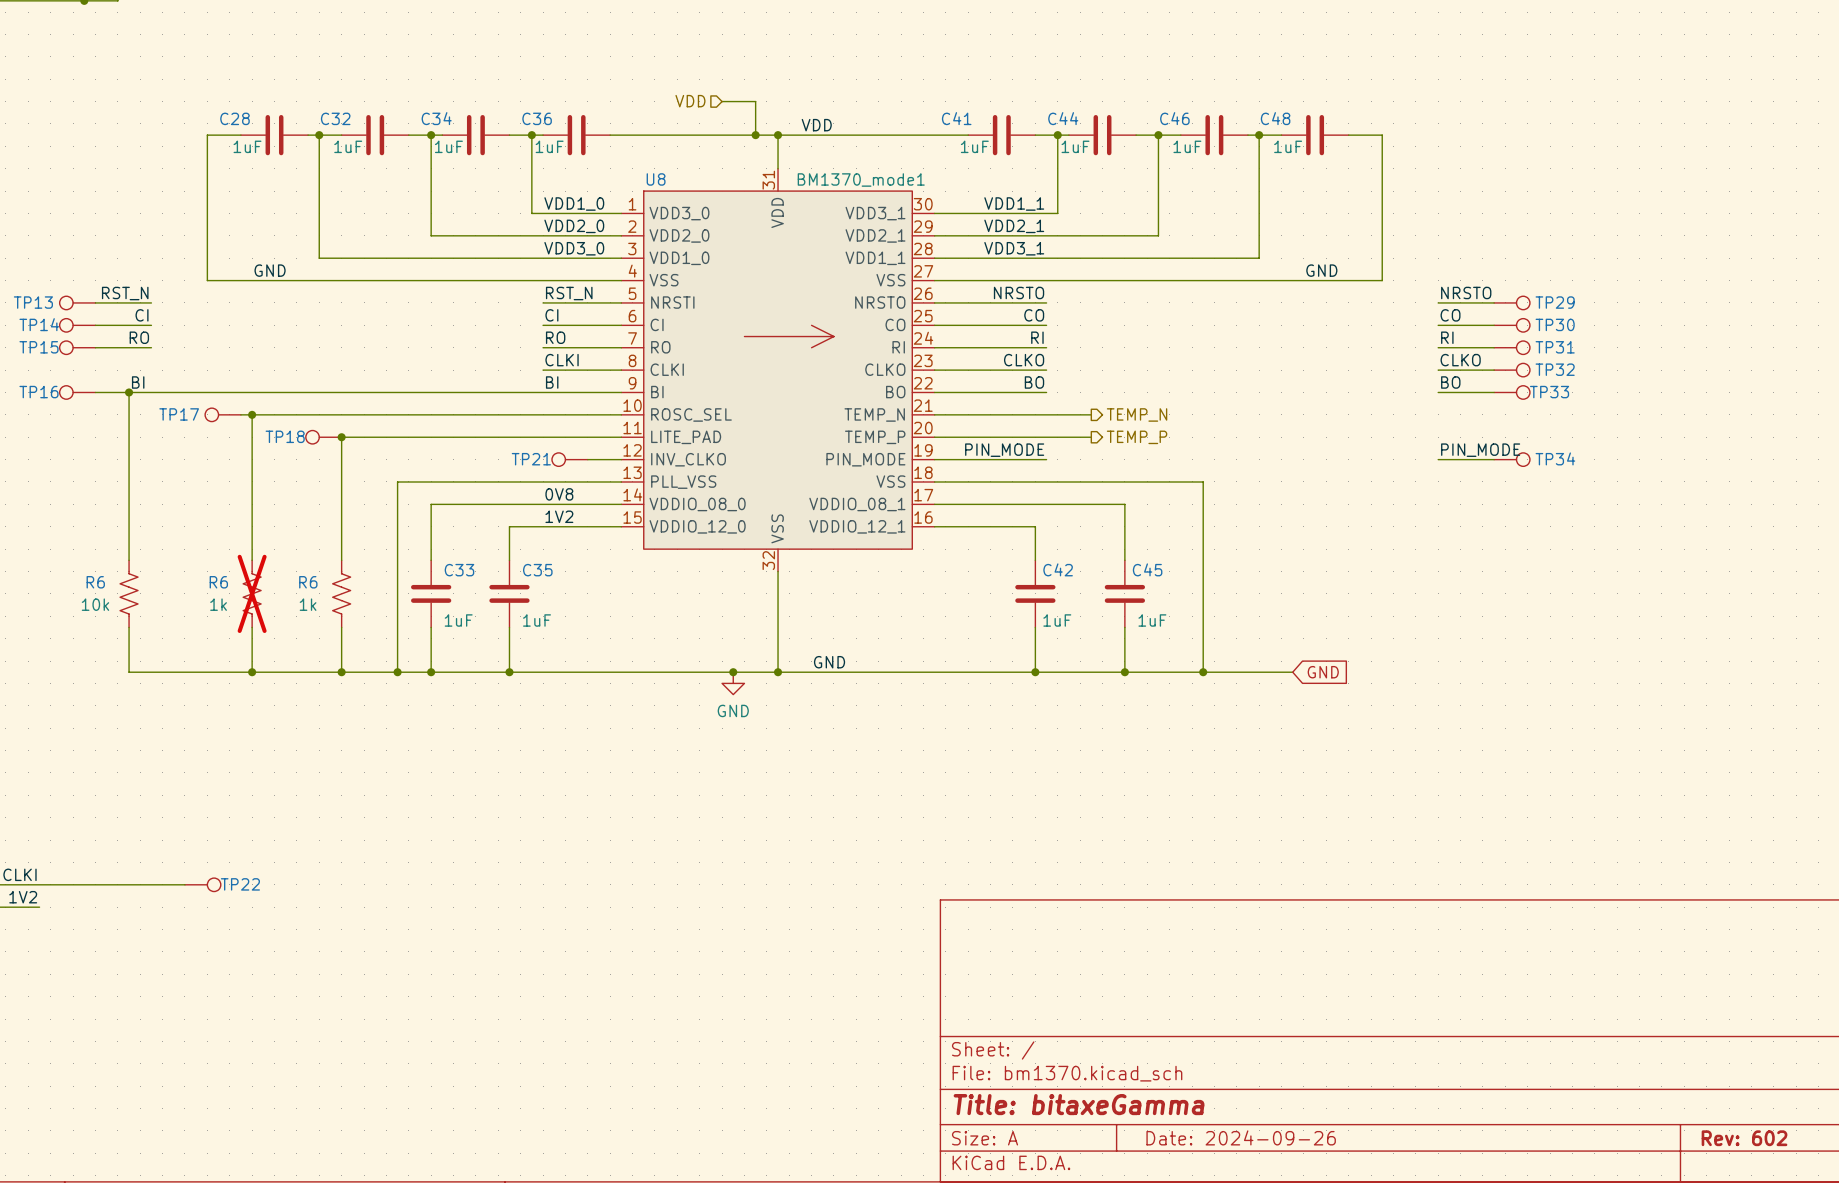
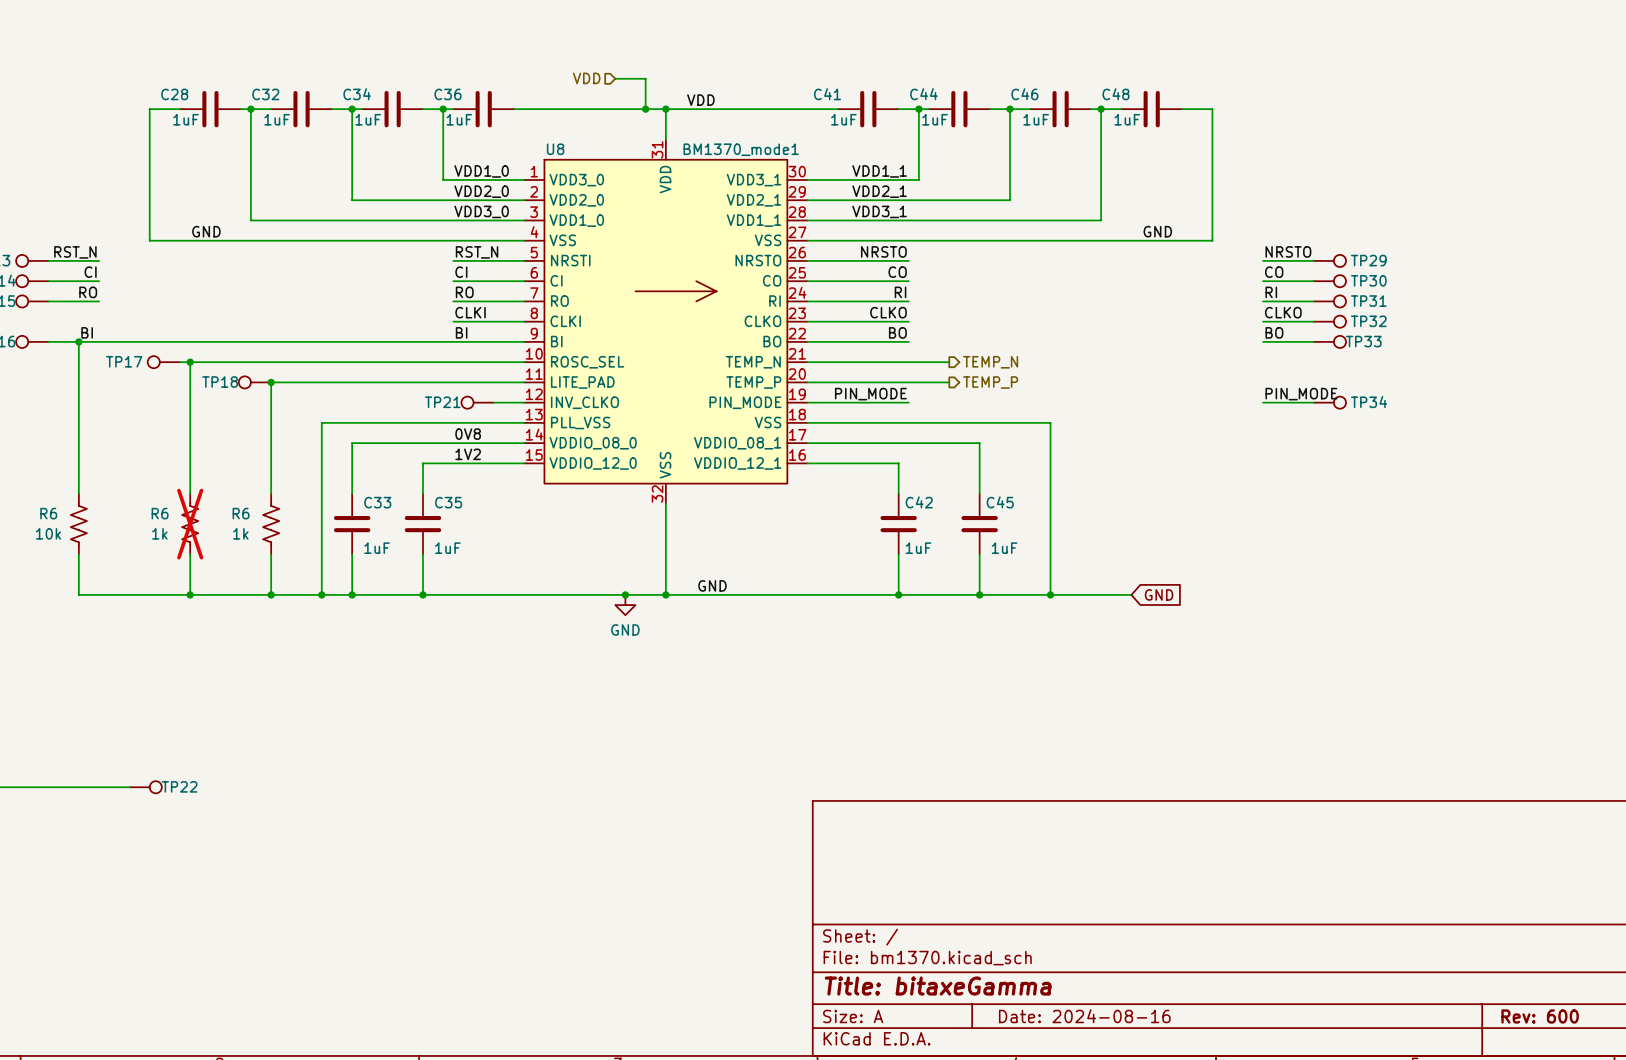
title block: Date: 2024-09-26 (1241, 1137) -> Date: 2024-08-16 (1084, 1016)
title block: Rev: 602 (1744, 1138) -> Rev: 600 (1540, 1016)

